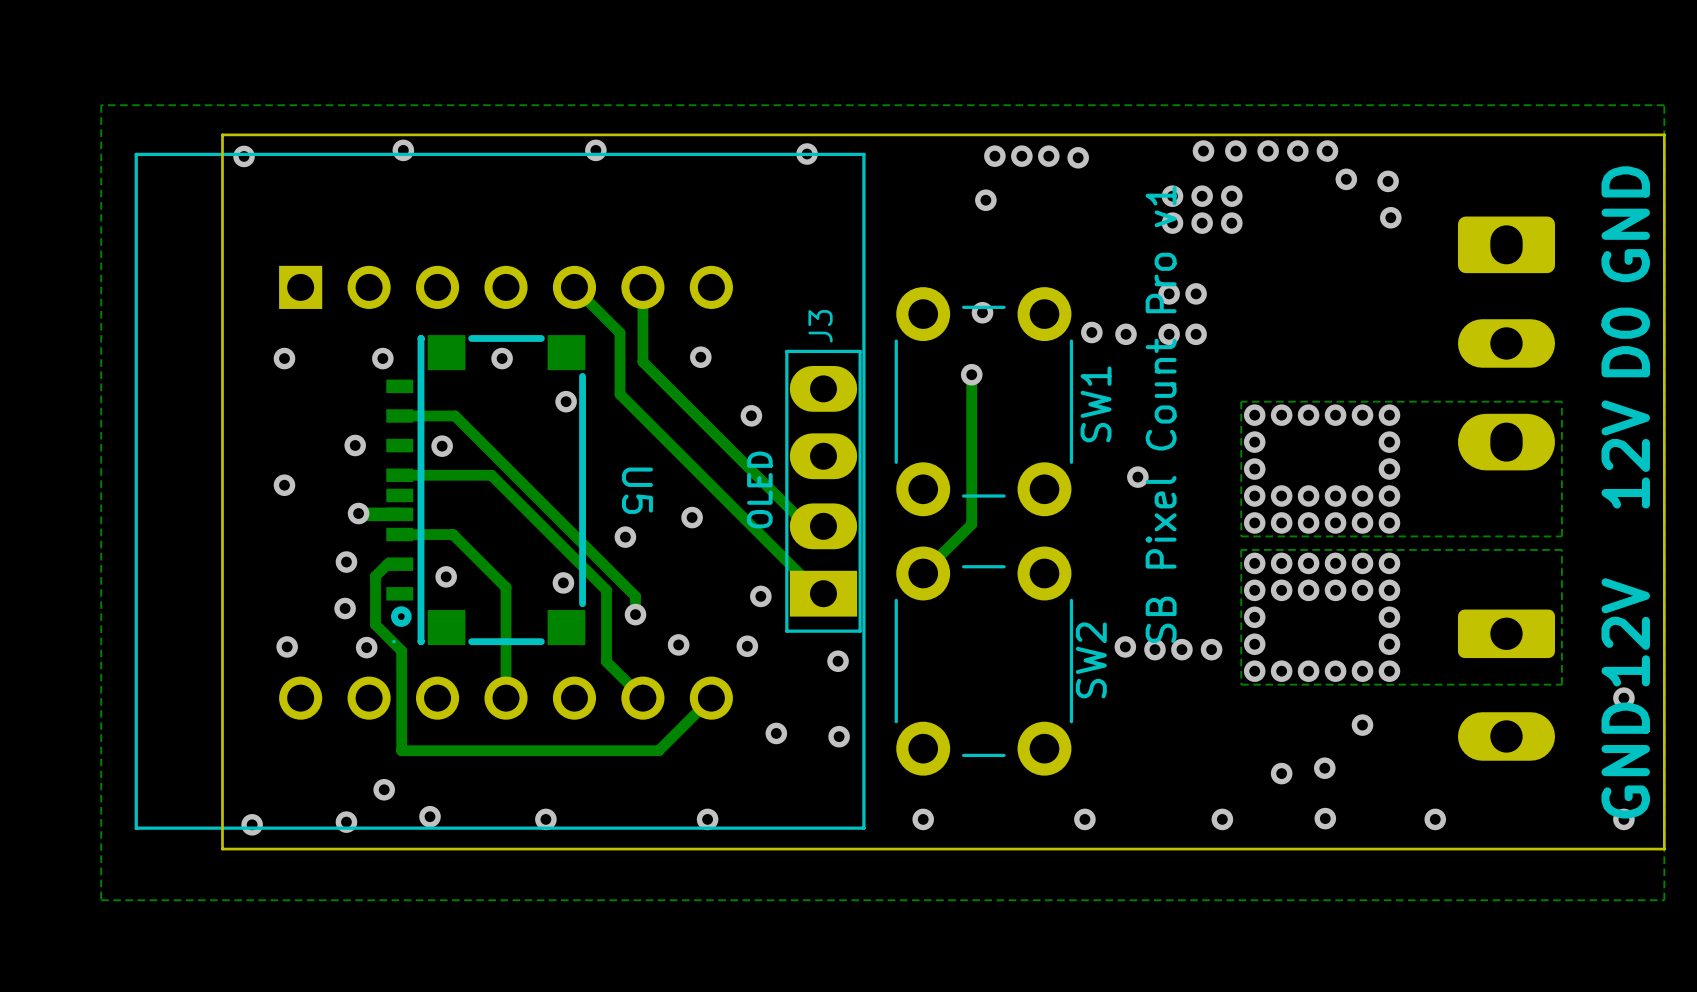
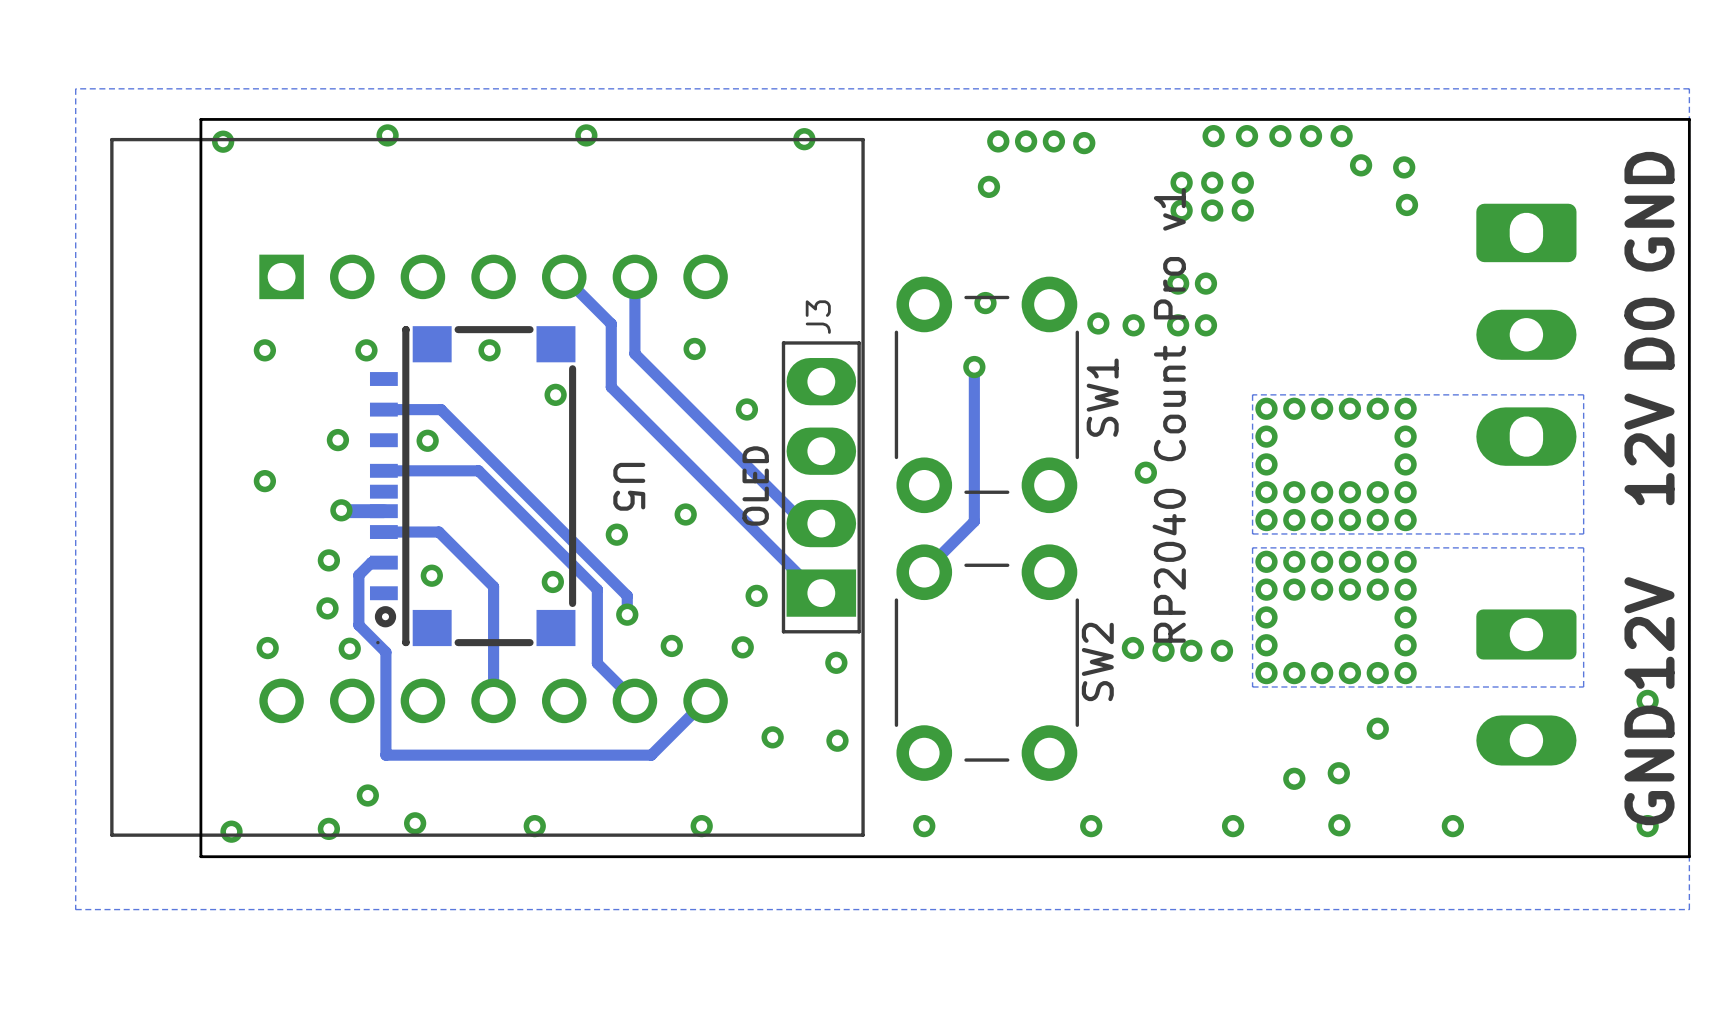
text: SB Pixel Count Pro v1 (1161, 414) -> RP2040 Count Pro v1 (1169, 415)

